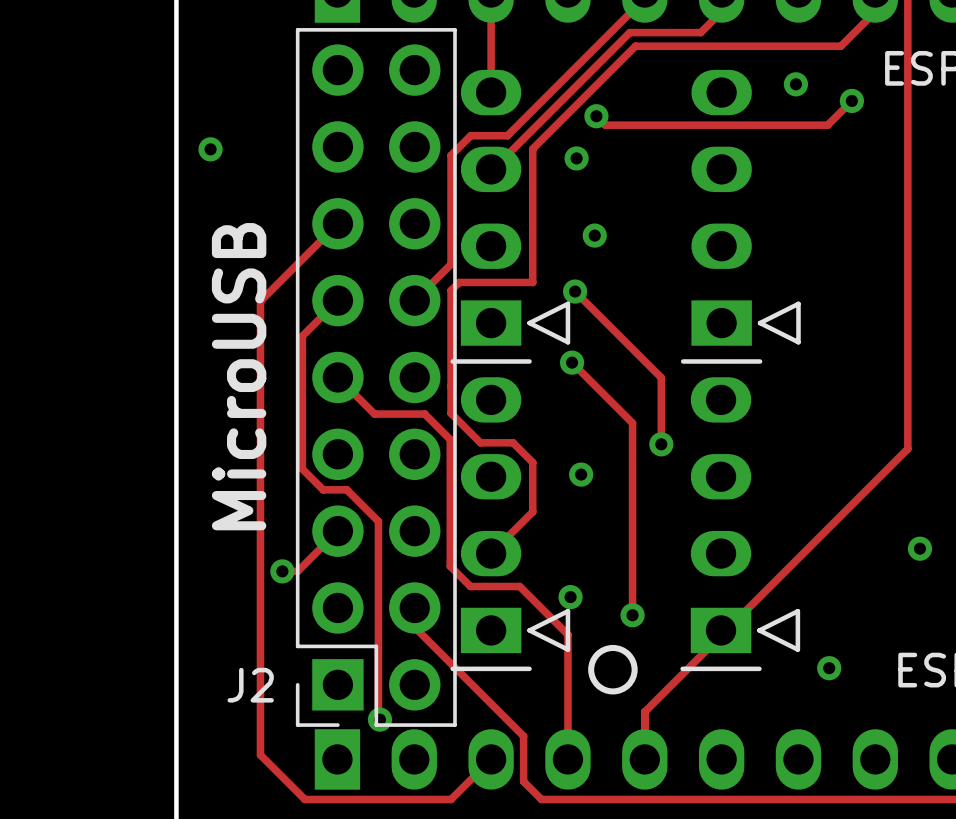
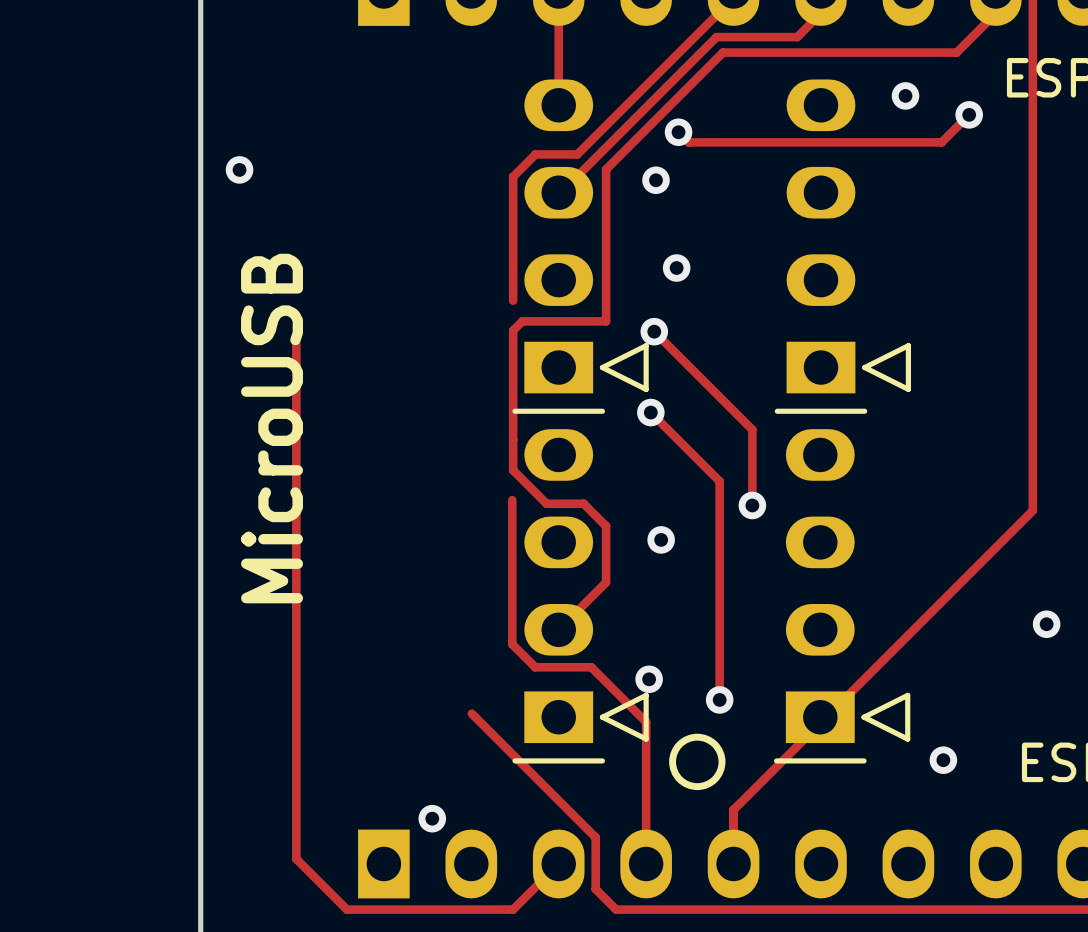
track: (337, 223) (260, 301) -> none
track: (451, 264) (414, 300) -> none
track: (337, 300) (302, 336) (302, 469) (323, 489) (346, 489) (378, 521) (378, 718) -> none
track: (337, 377) (374, 414) (424, 414) (450, 439) -> none
J2: (376, 377) -> none
track: (337, 531) (297, 571) (282, 571) -> none
via: (282, 571) -> none

